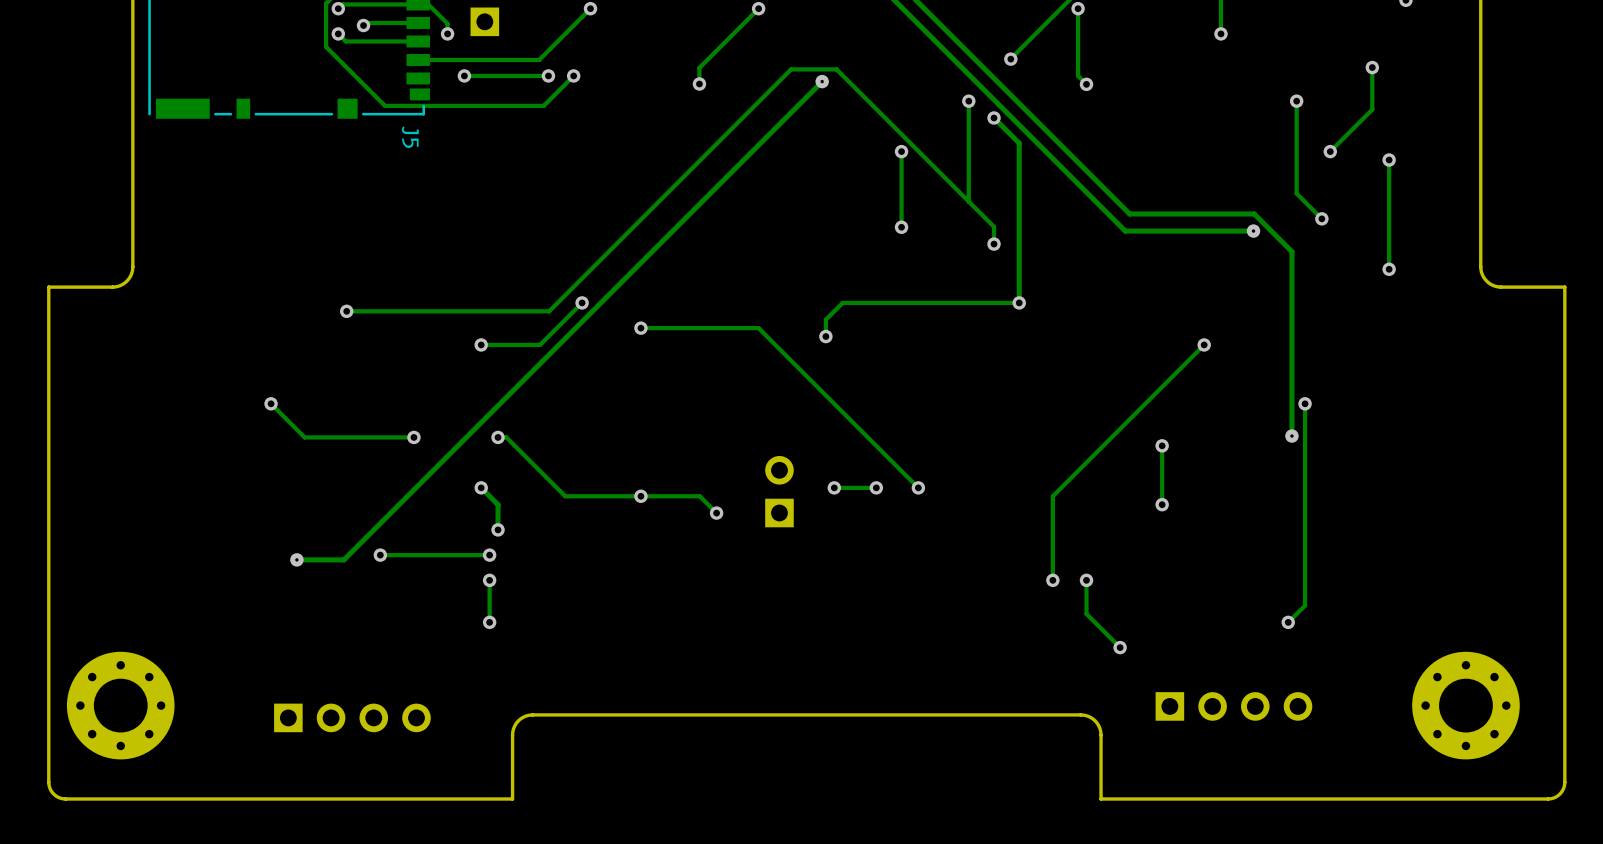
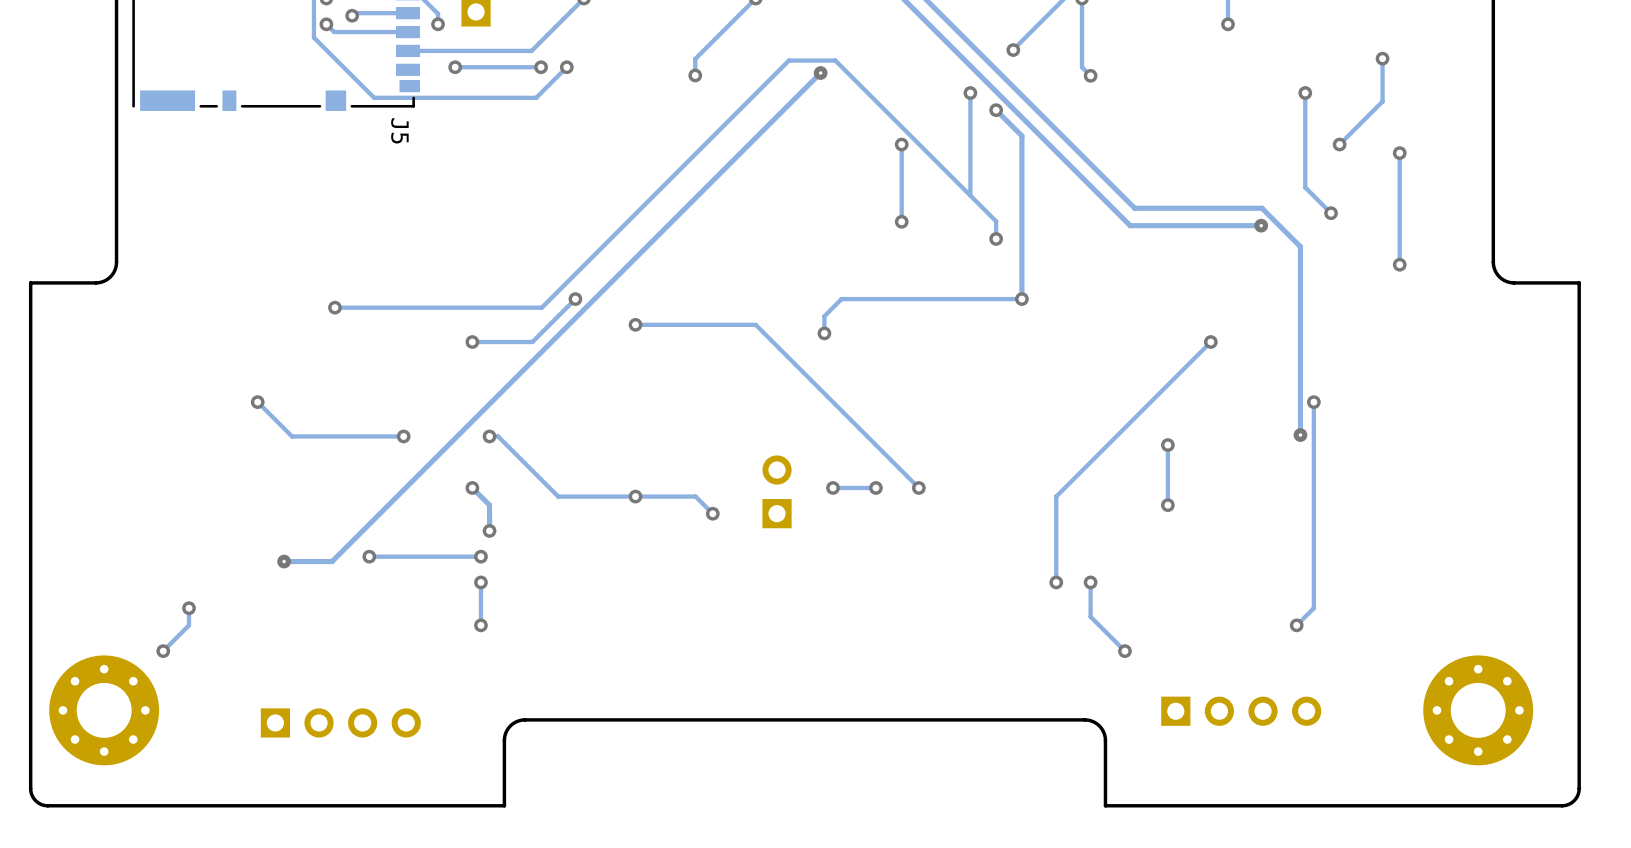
track: none -> (189, 608) (189, 625) (163, 651)
via: none -> (189, 608)
via: none -> (163, 651)

